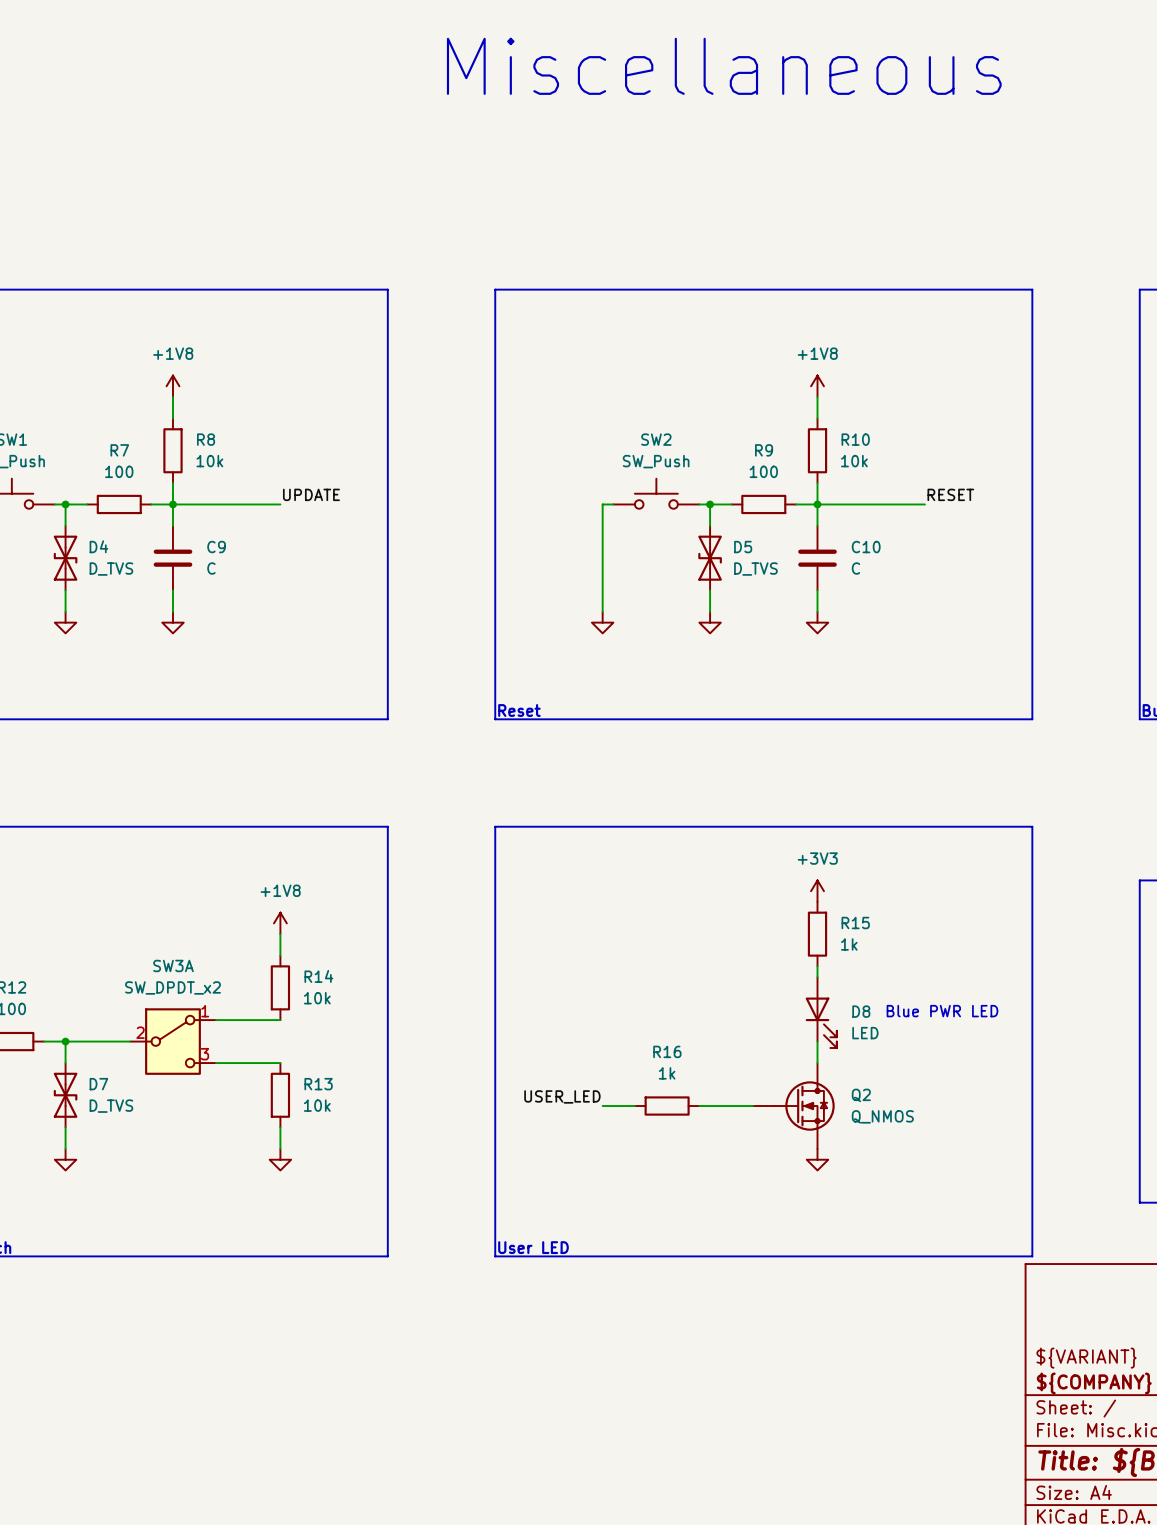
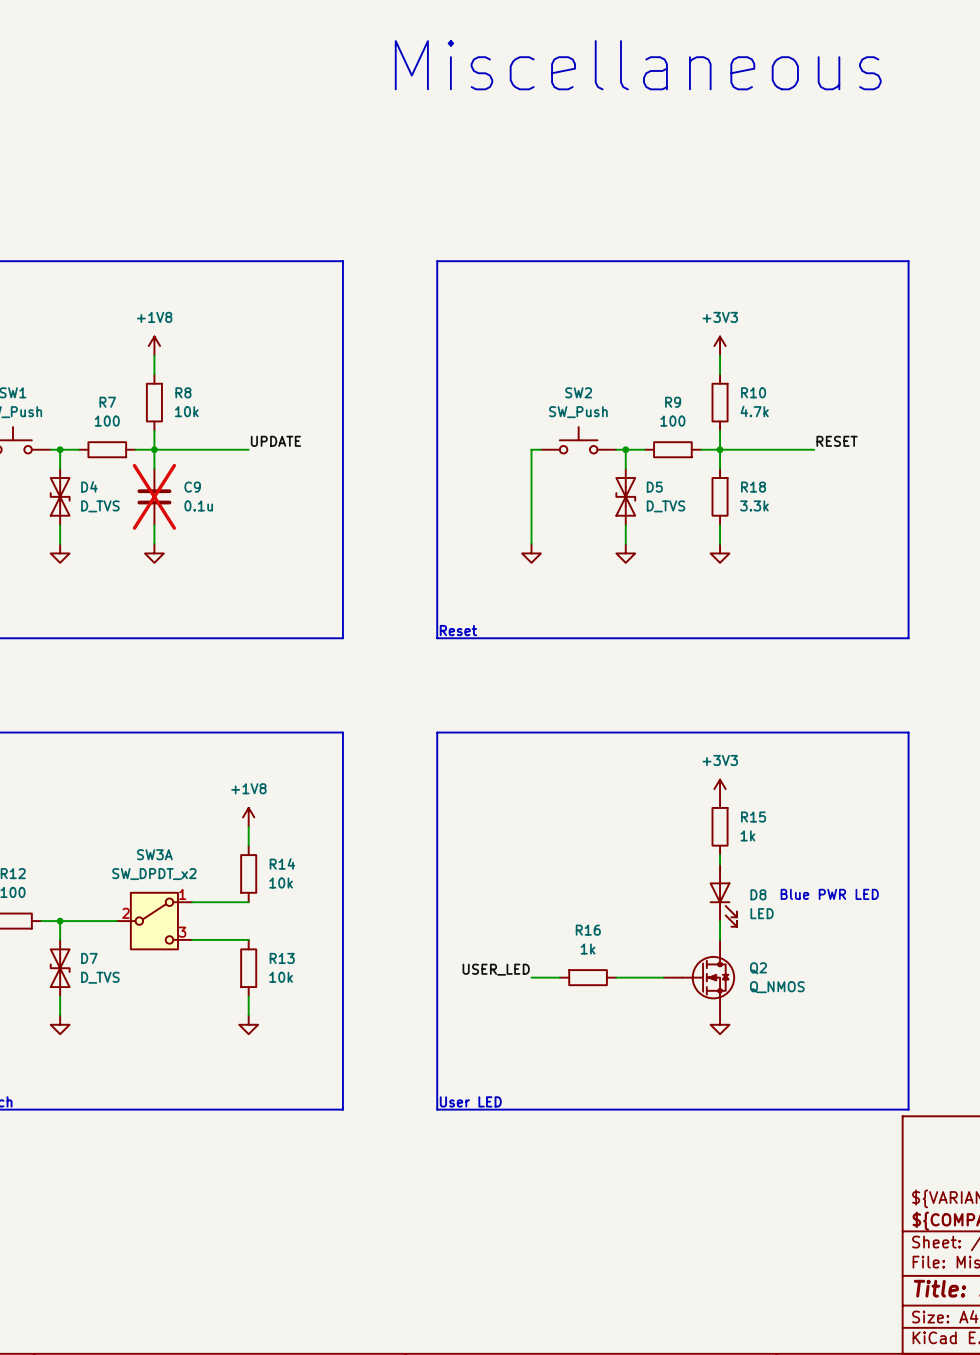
power symbol: +1V8 (817, 386) -> +3V3 (720, 346)
R10 value: 10k (854, 461) -> 4.7k (754, 411)
C9 do-not-place cross: none -> (154, 496)
C10: C (817, 558) -> none
R18: none -> 3.3k (720, 496)
C9 value: C (211, 568) -> 0.1u (198, 505)

